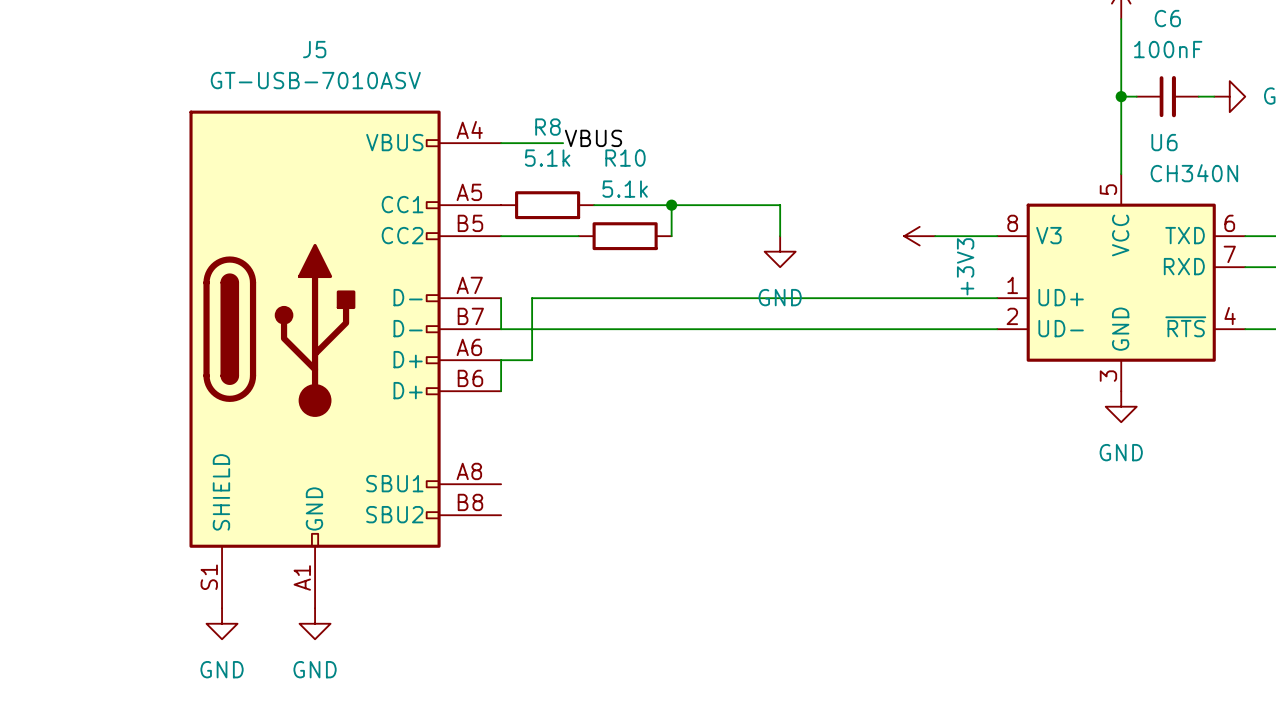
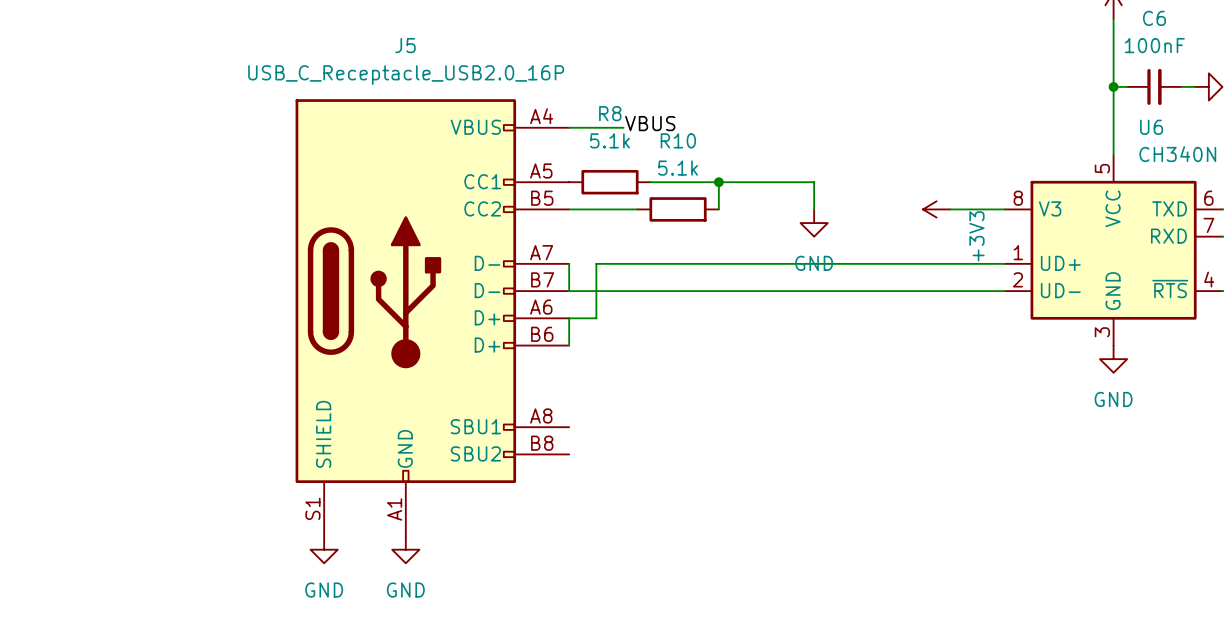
J5 value: GT-USB-7010ASV (315, 80) -> USB_C_Receptacle_USB2.0_16P (406, 75)

